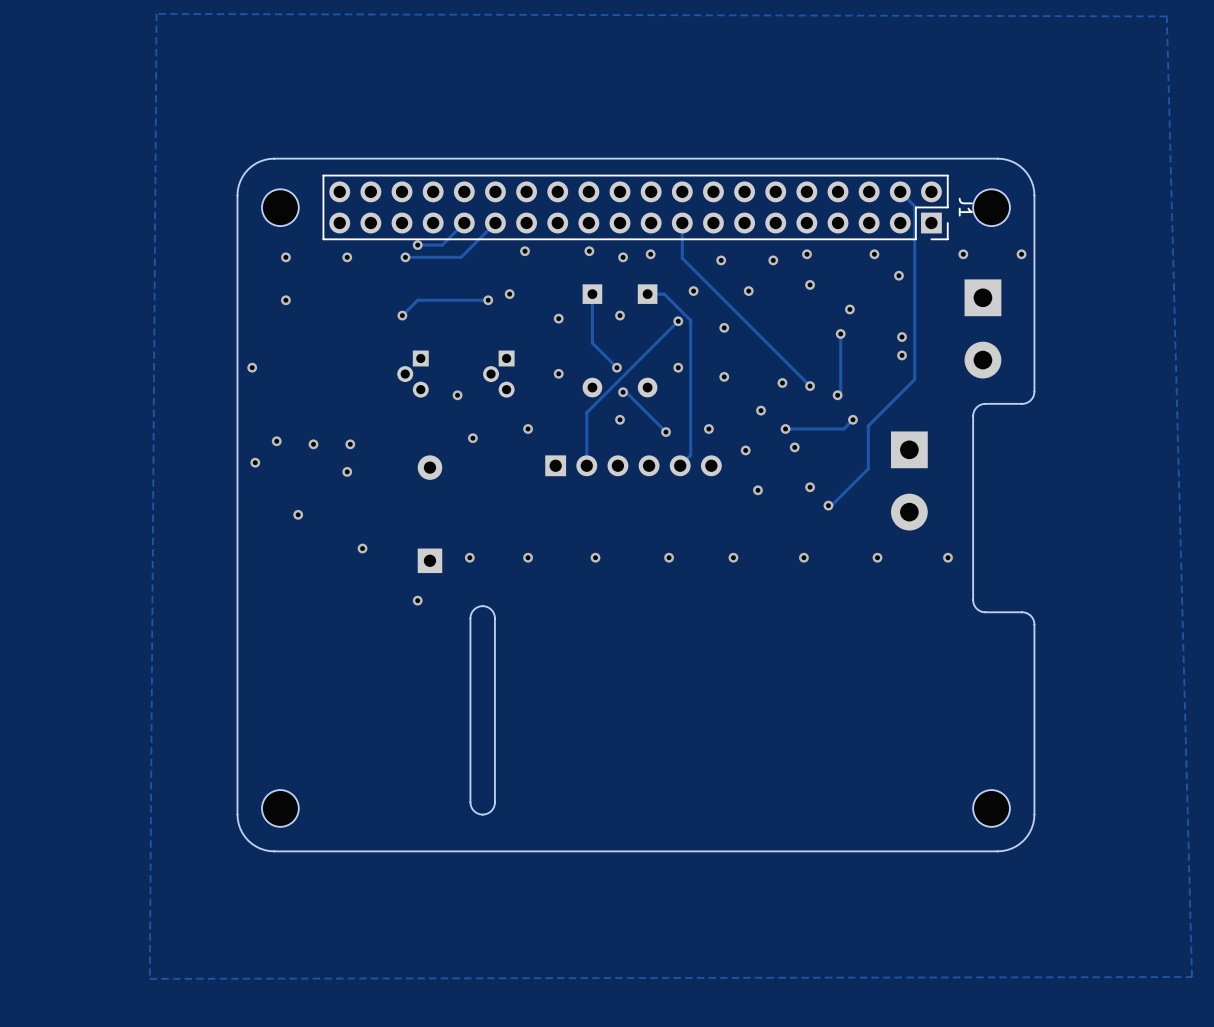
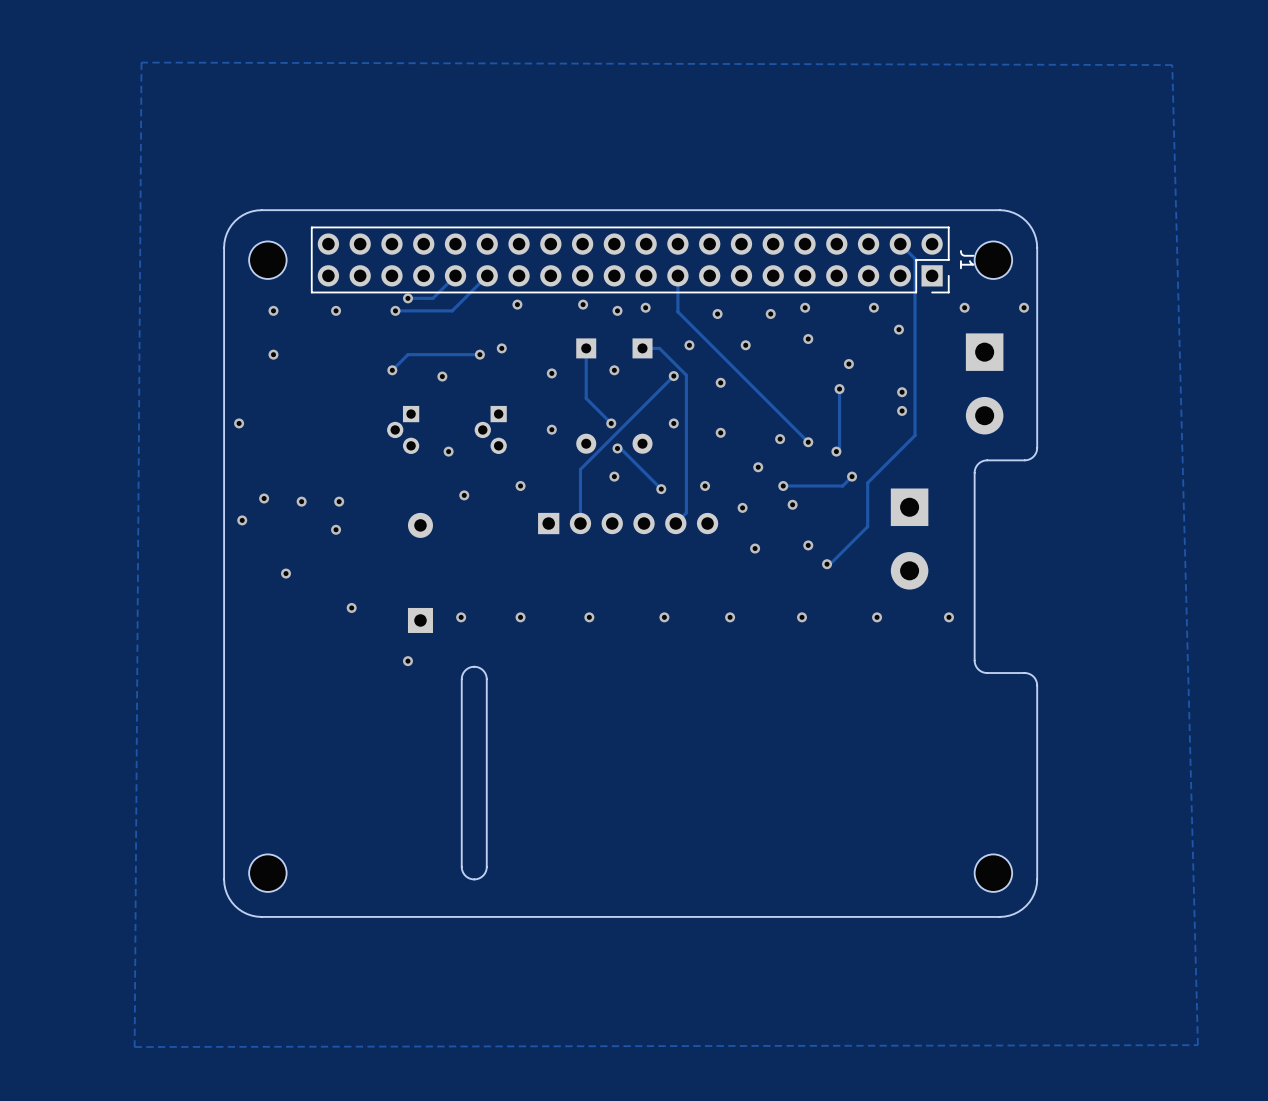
via: none -> (442, 376)

